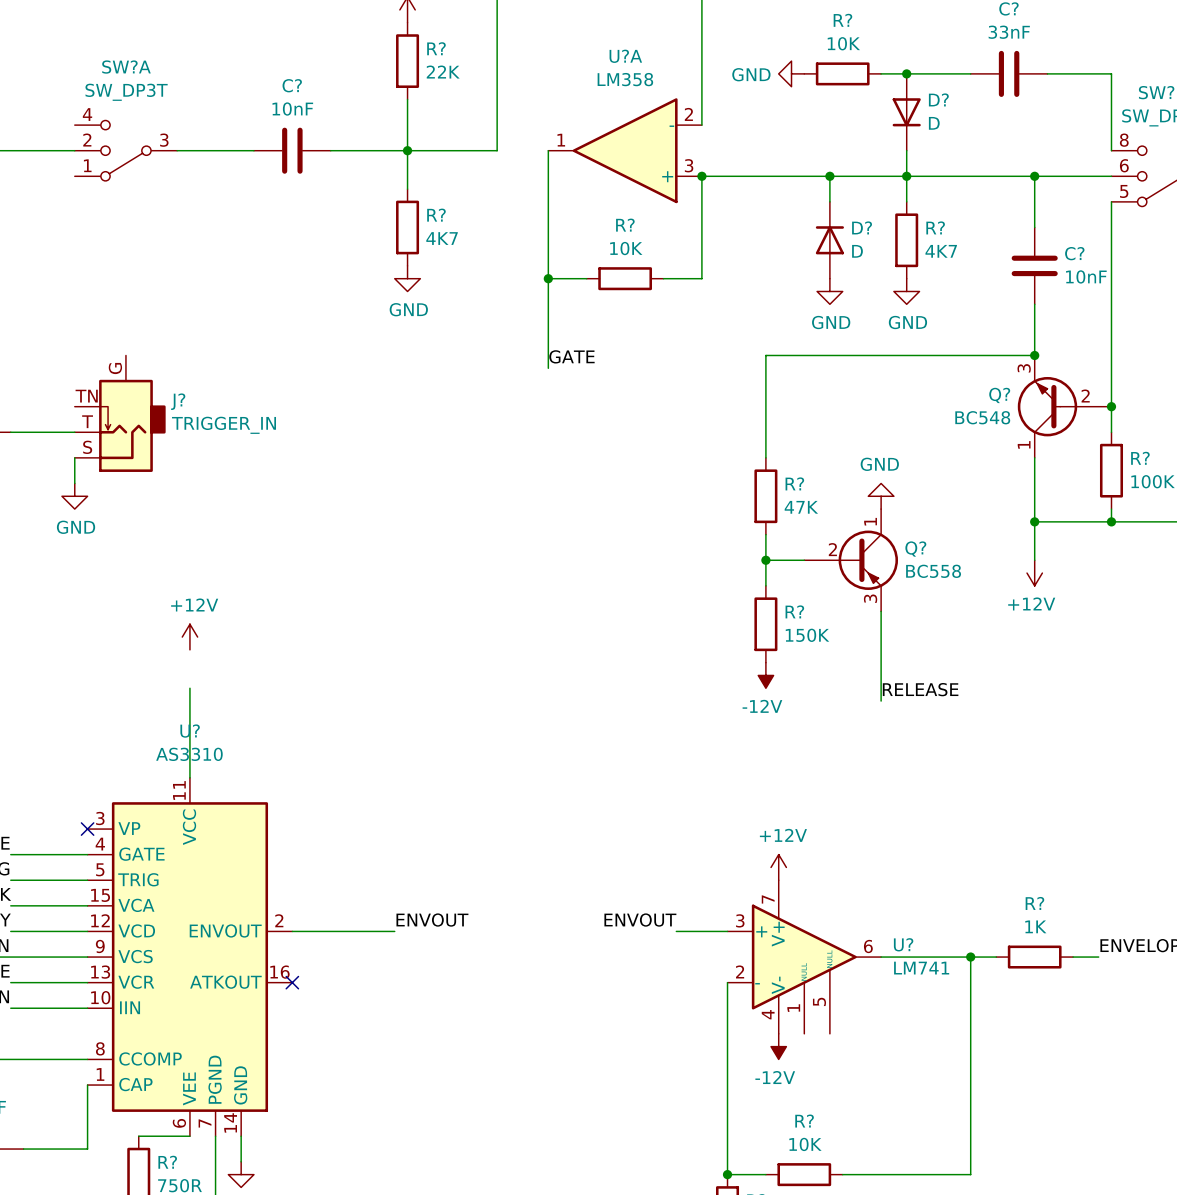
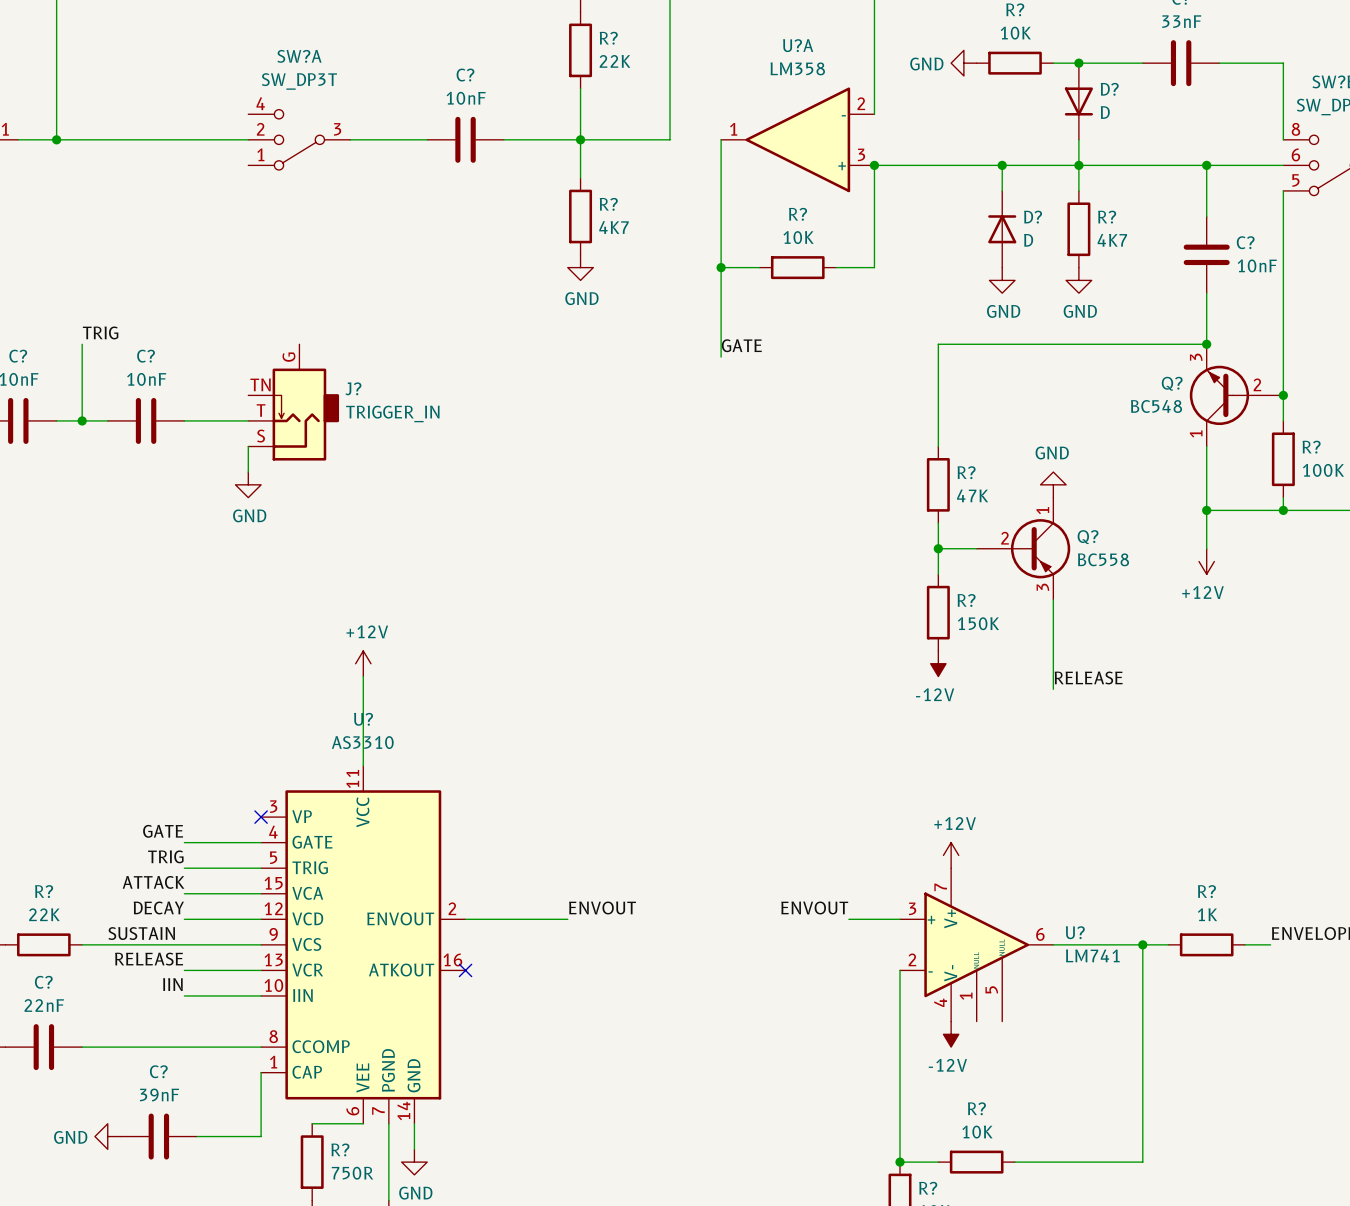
power symbol position: +12V (189, 637) -> +12V (363, 663)

